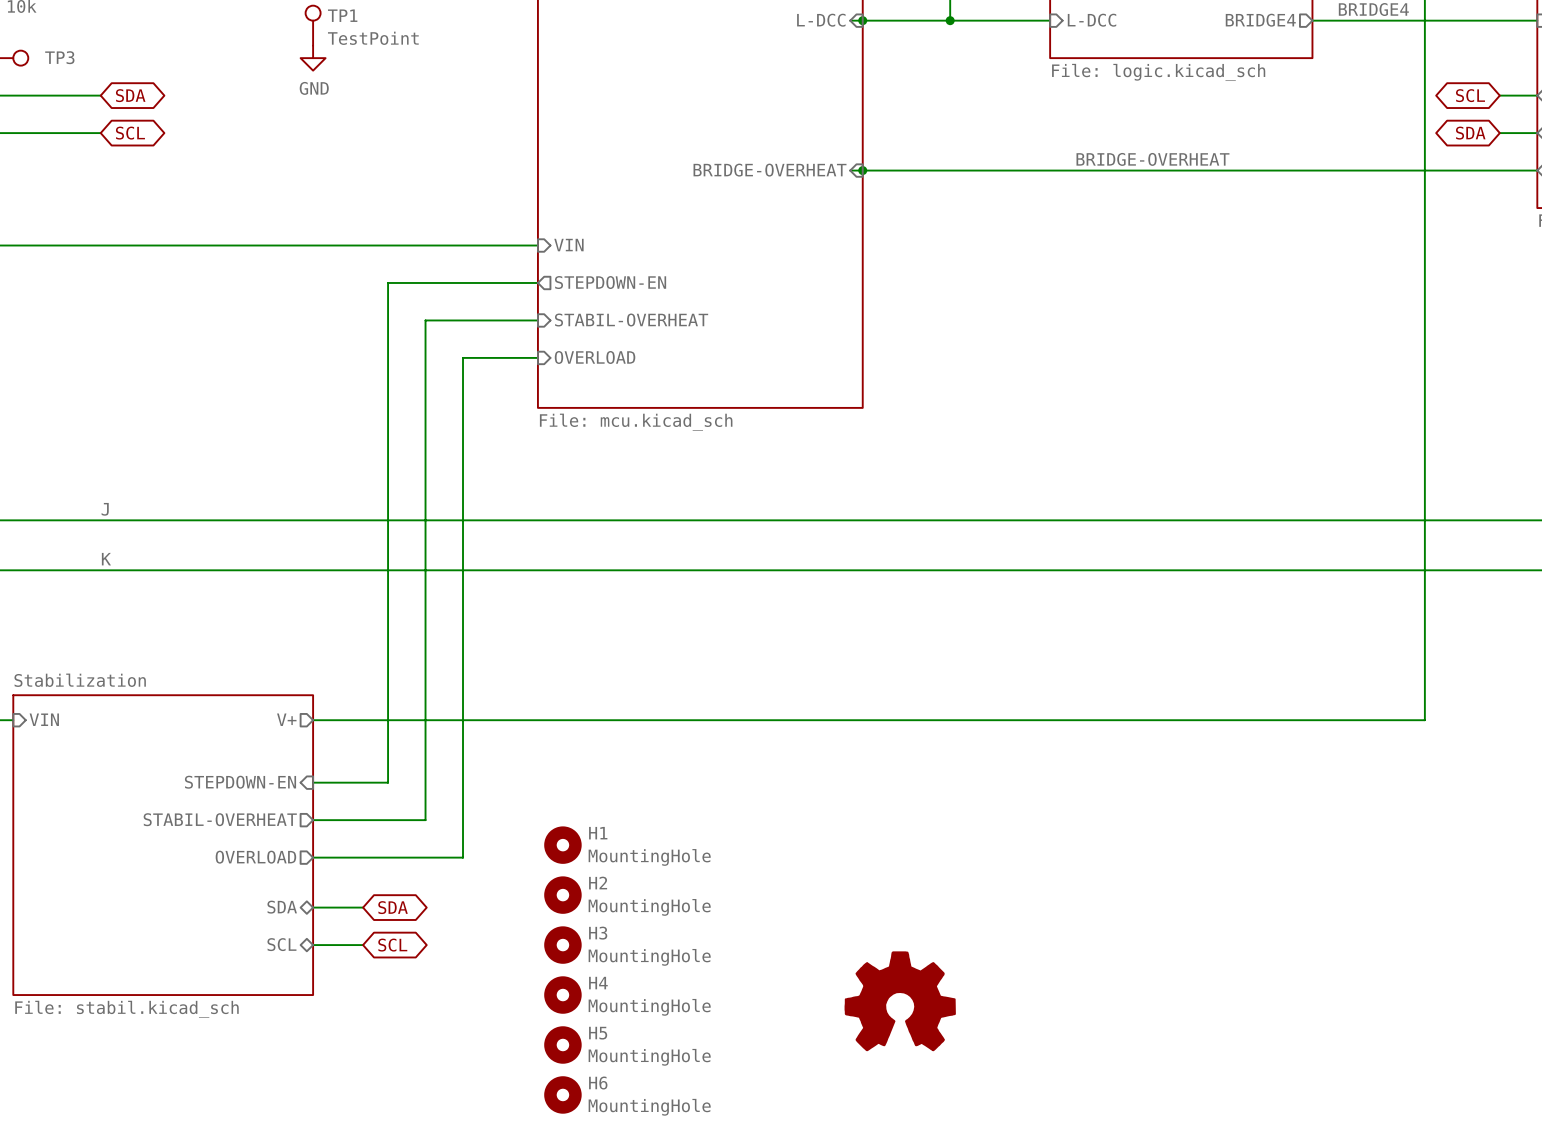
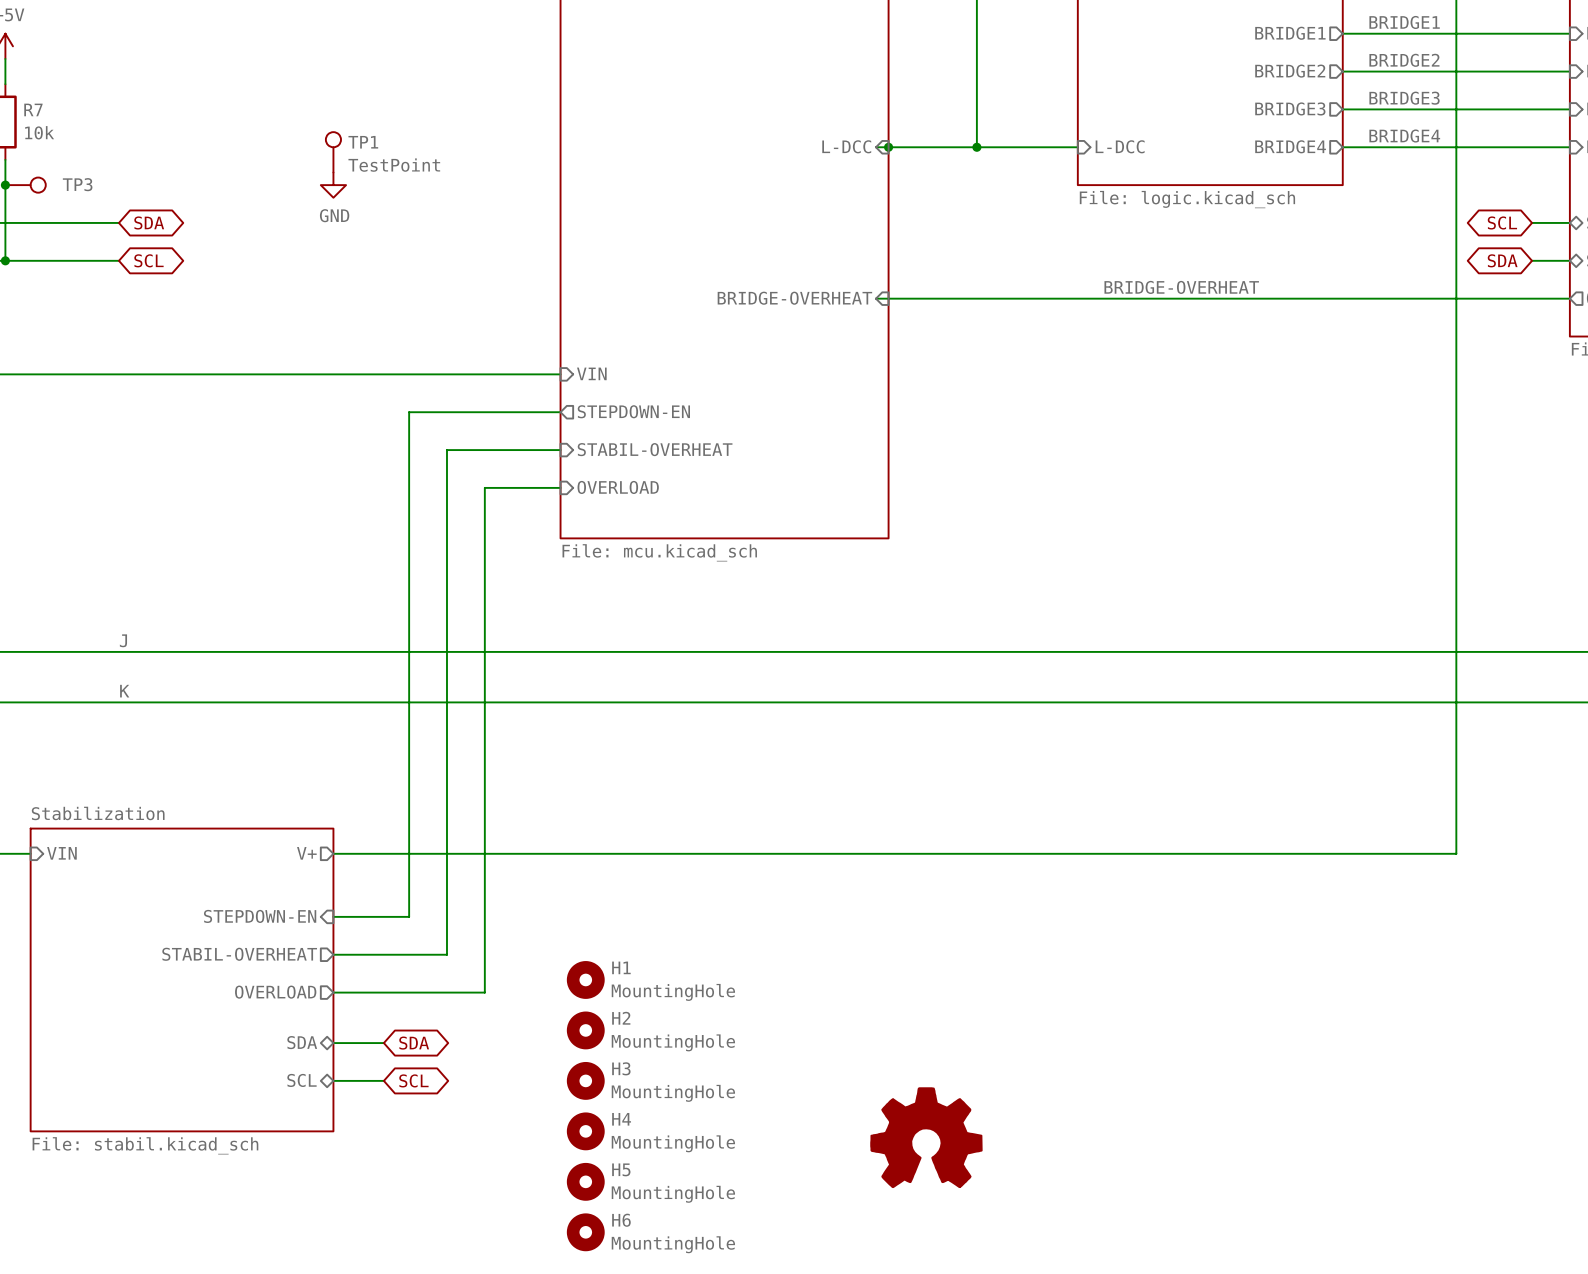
junction: (862, 170) -> none

